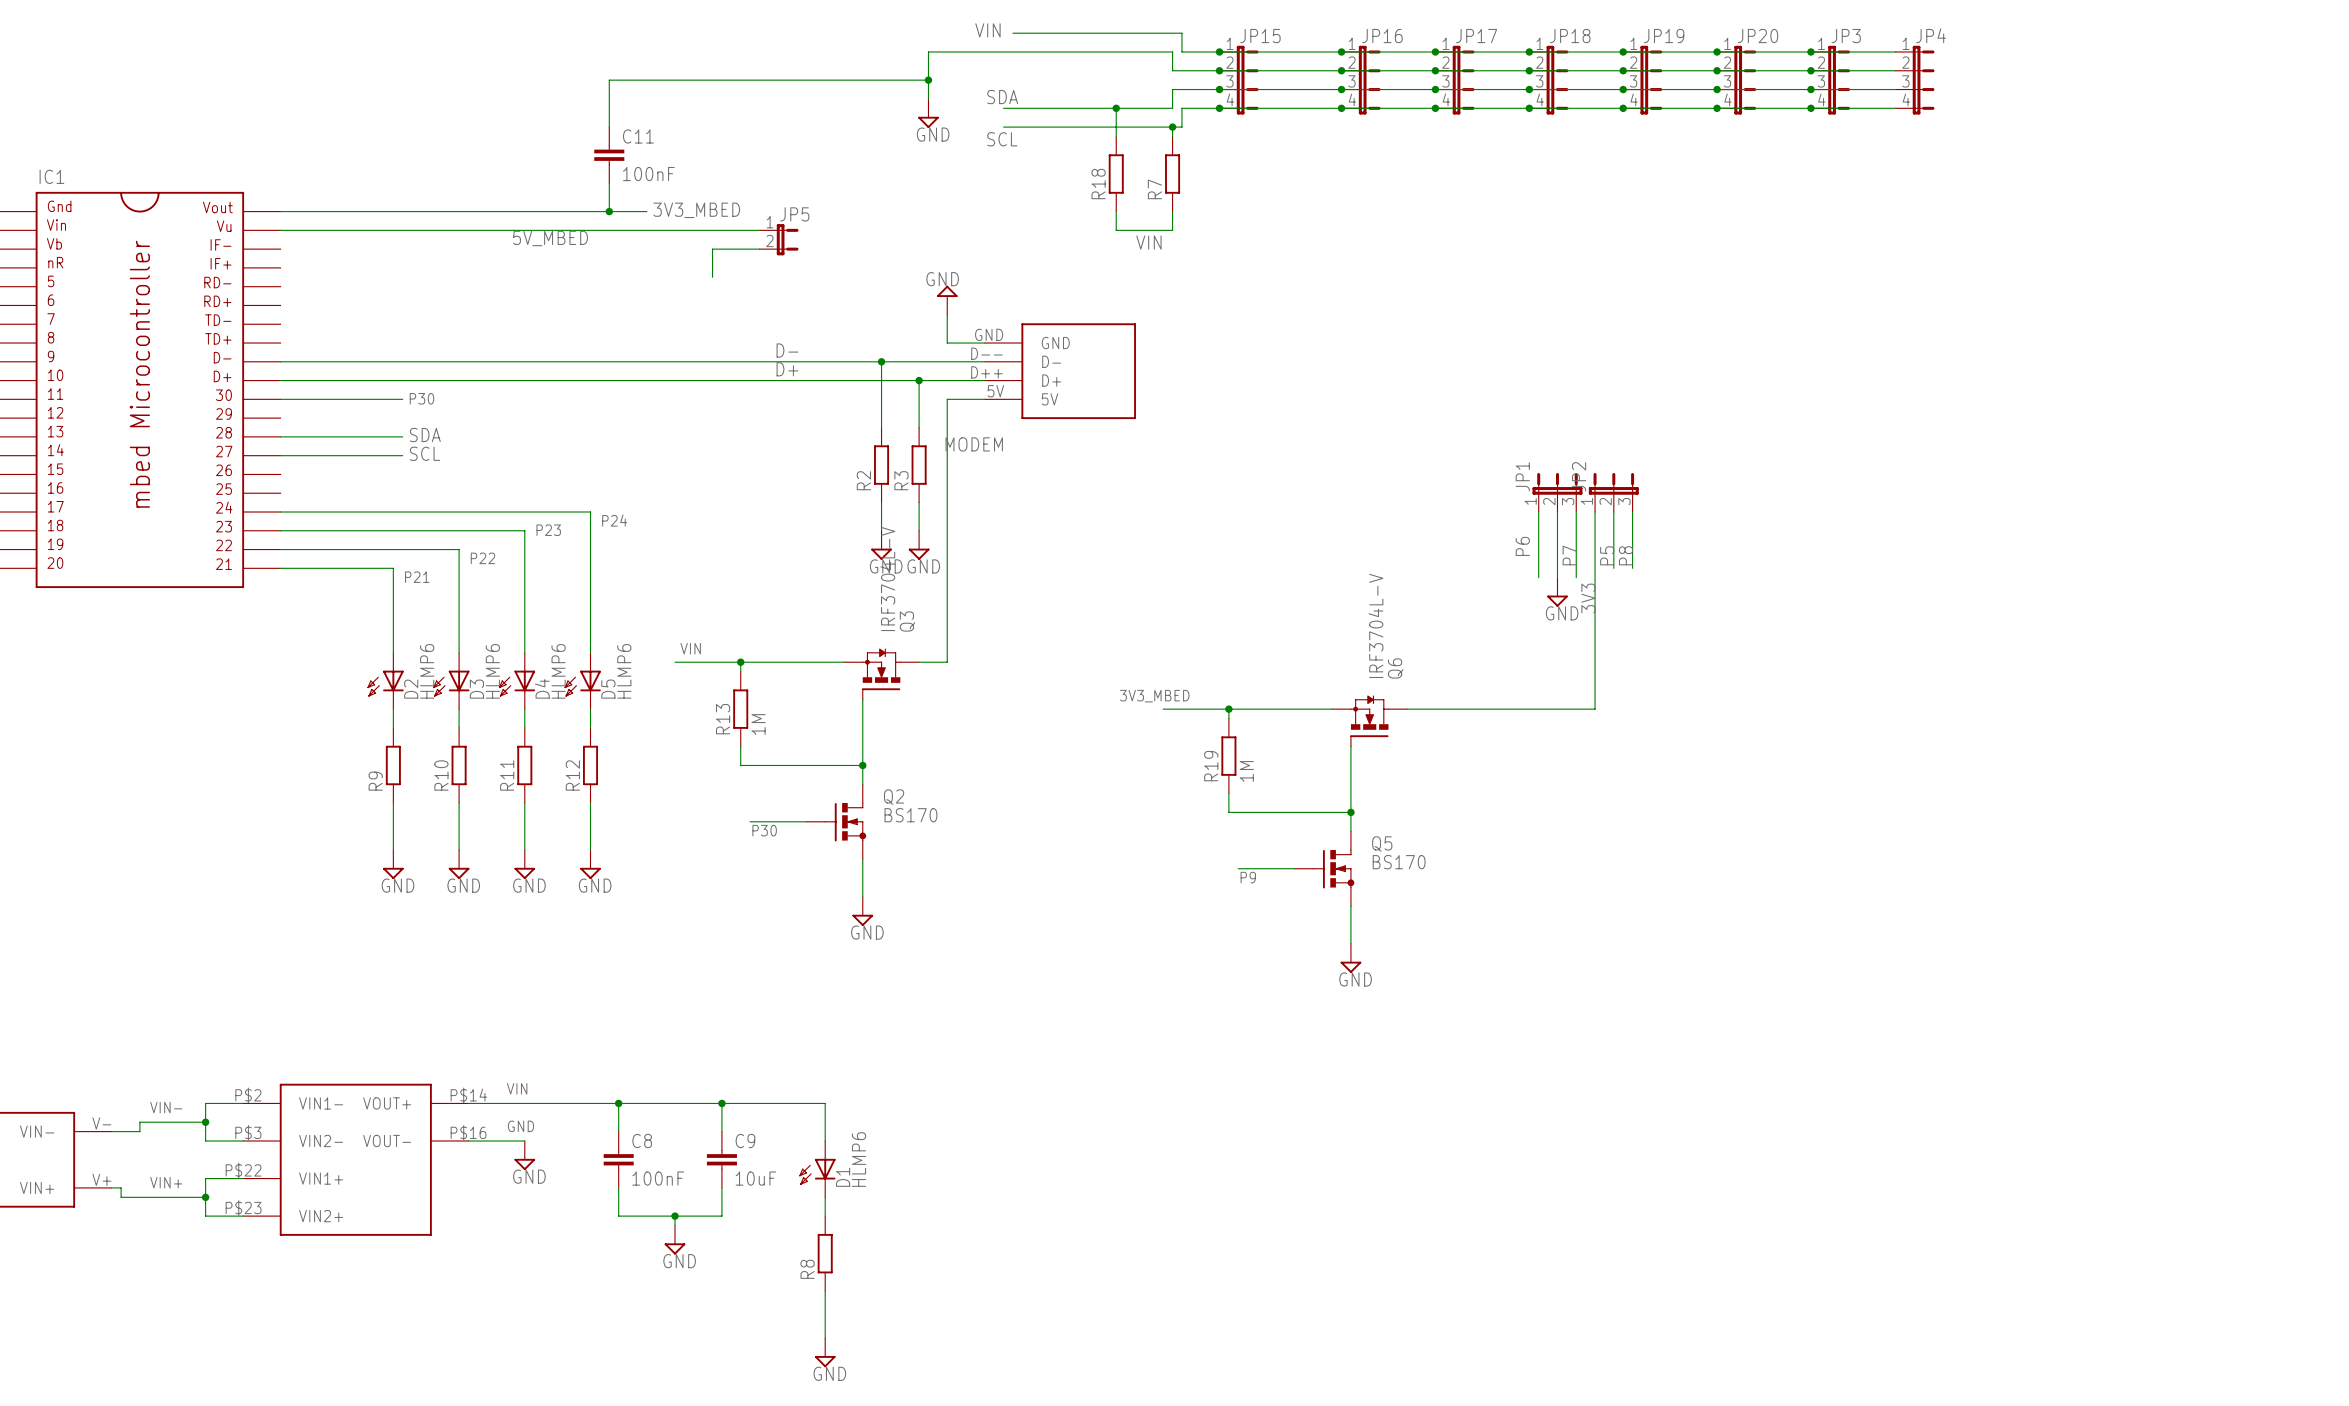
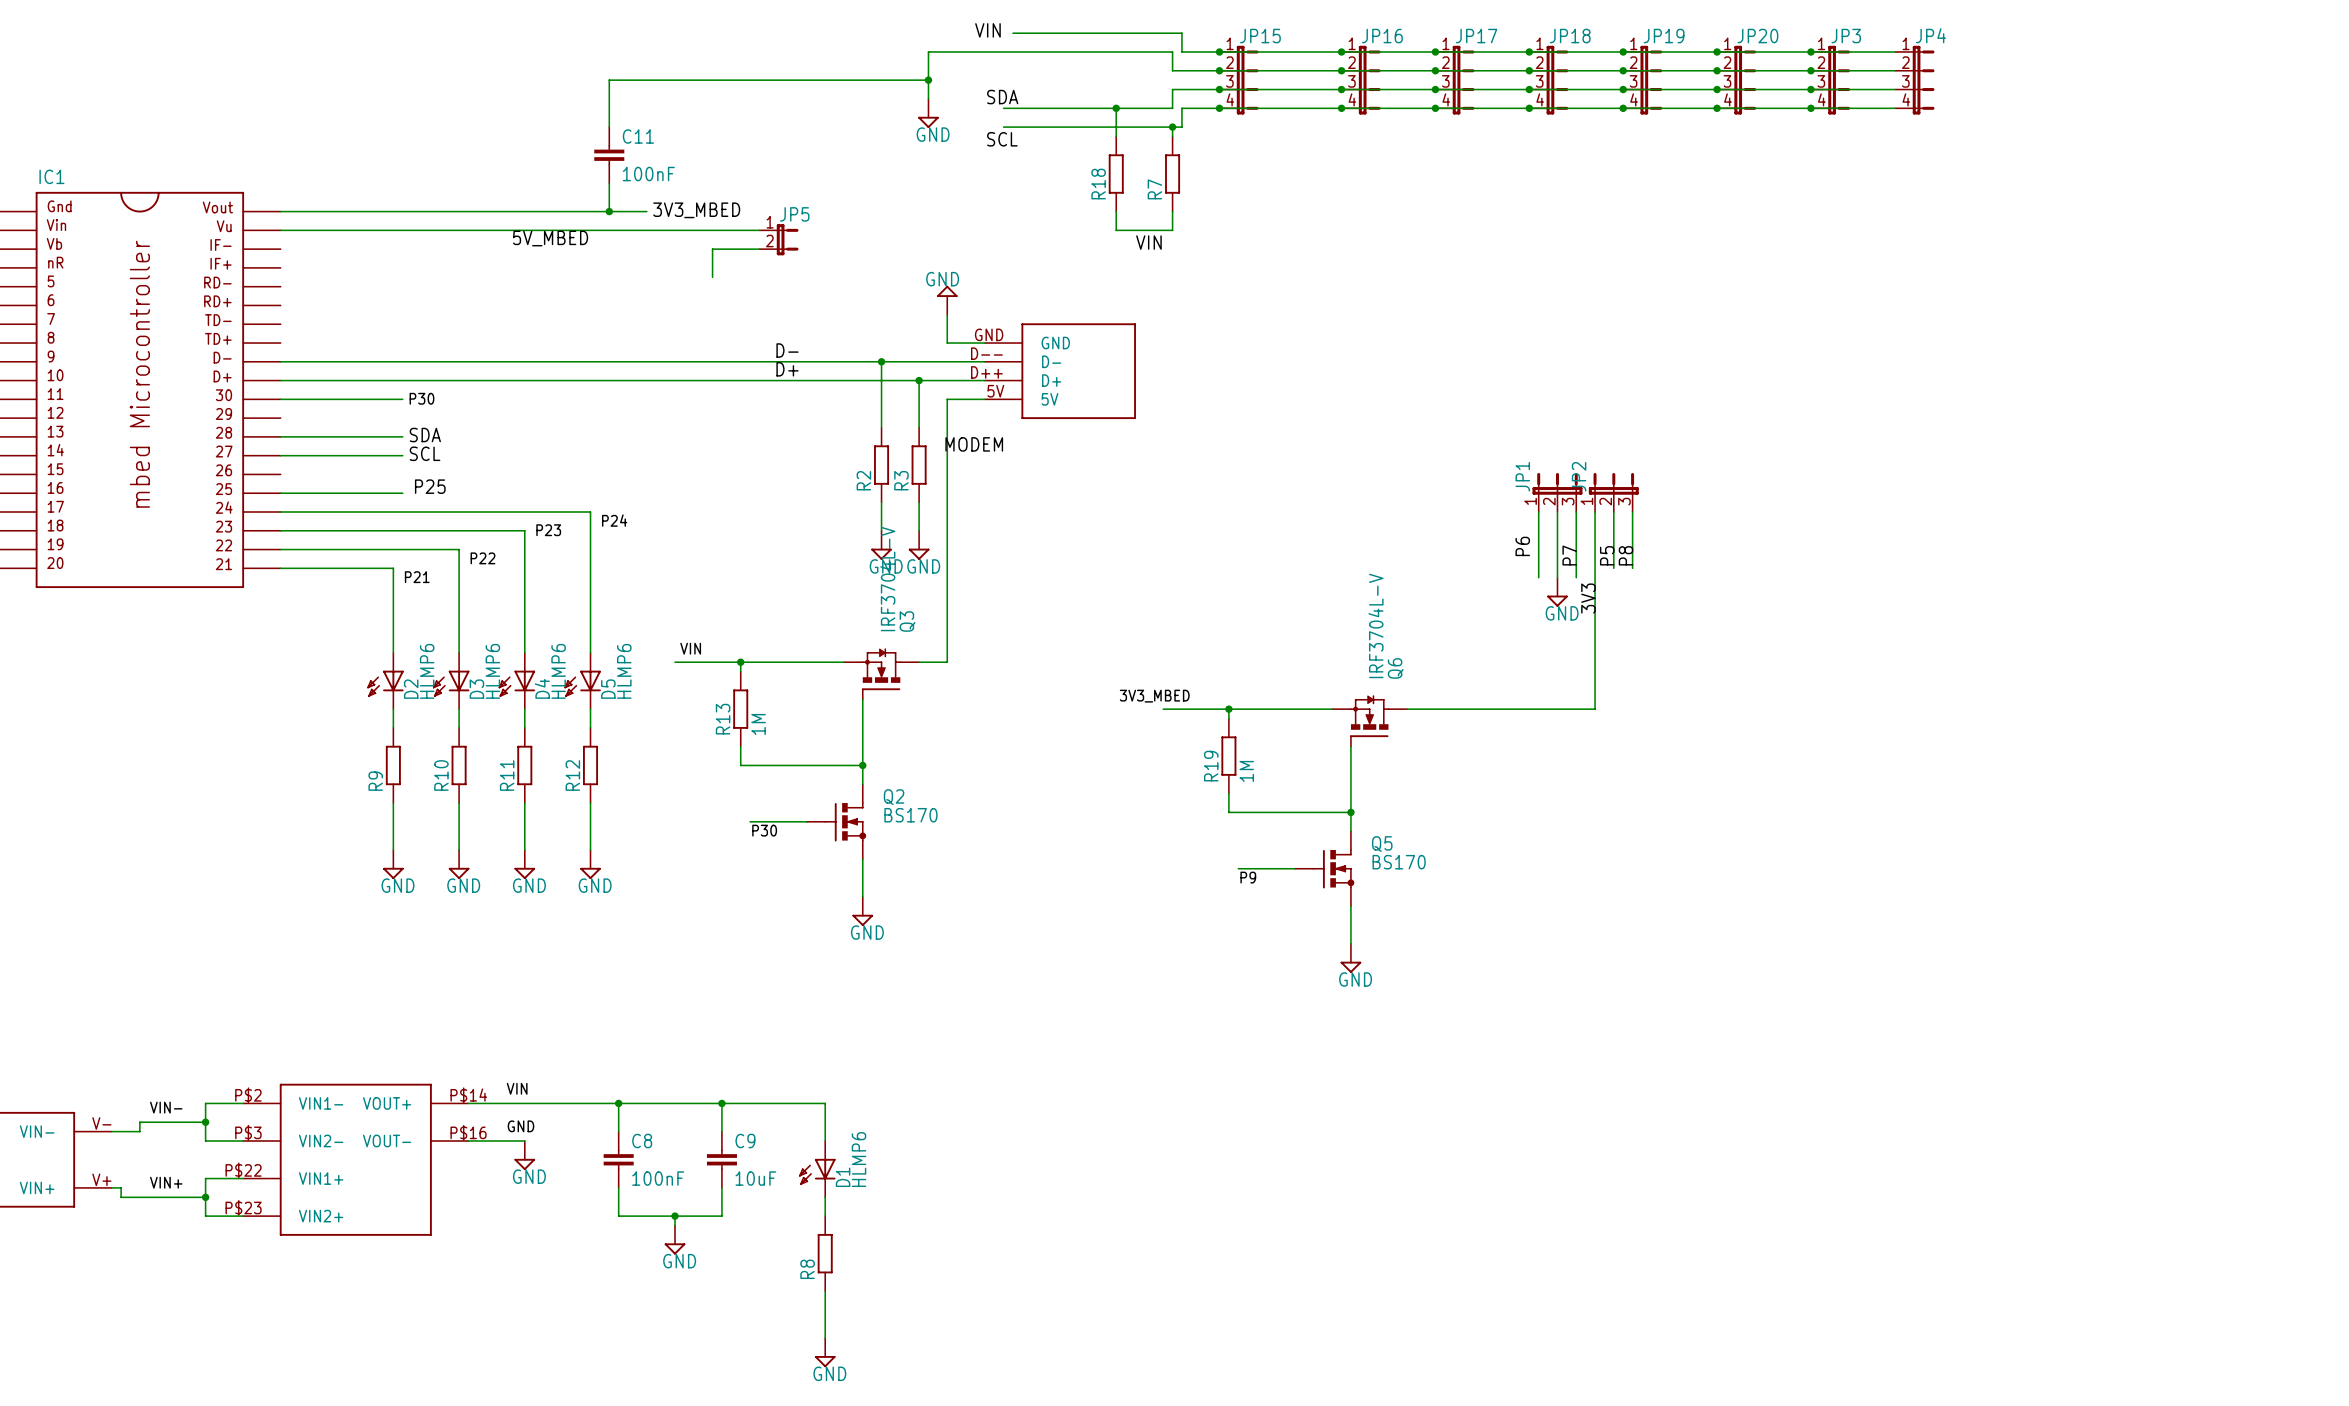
label: none -> P25 (430, 486)
wire: none -> (280, 493) (402, 493)

